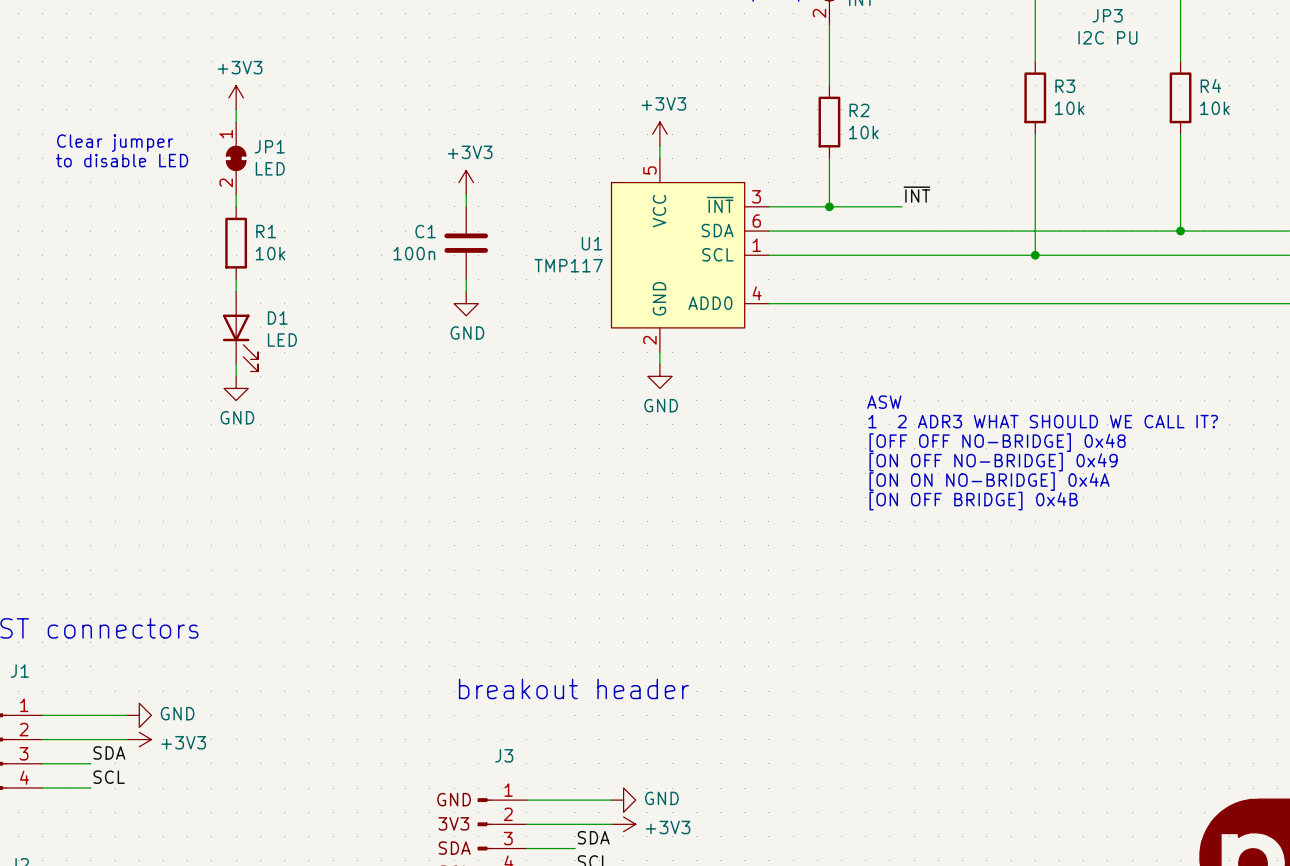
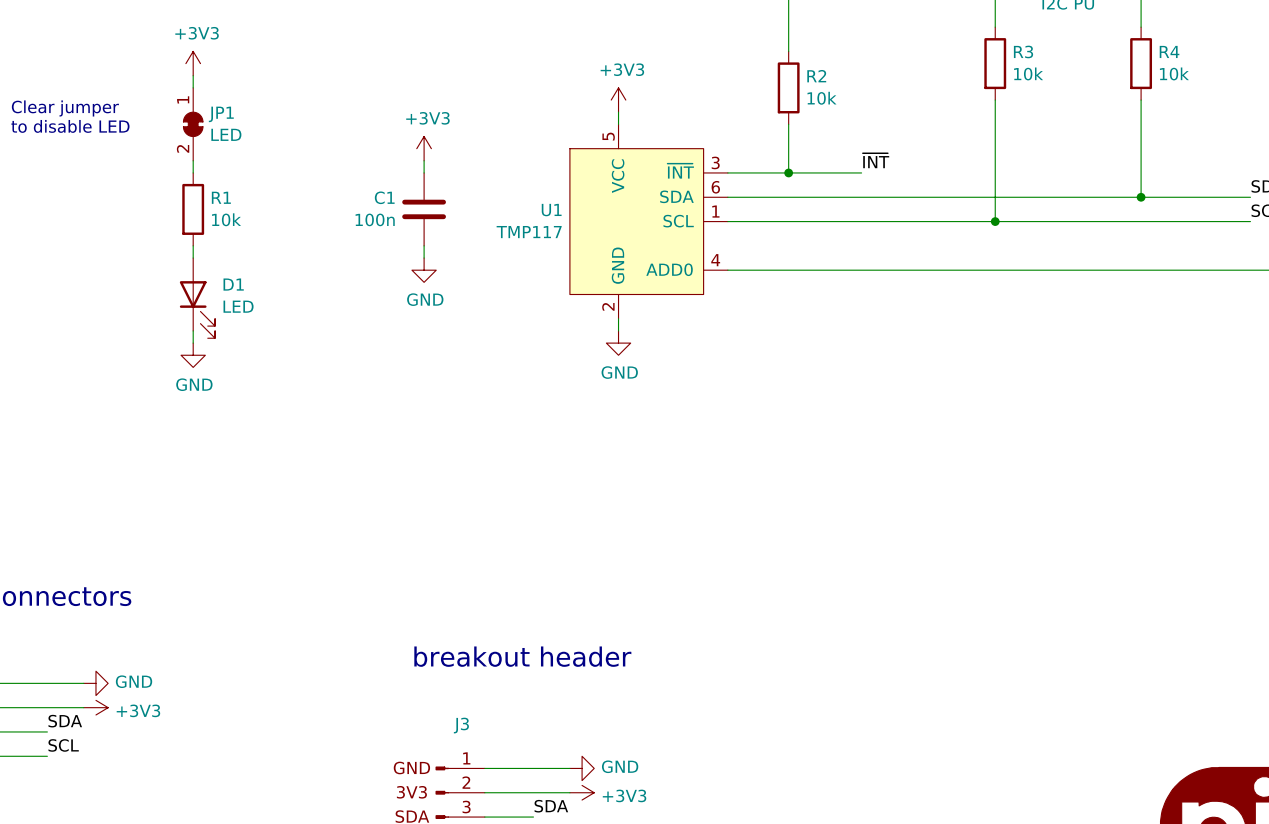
text: ASW (884, 402) -> none
text: 1 2 ADR3 WHAT SHOULD WE CALL IT? (1043, 421) -> none
text: [OFF OFF NO-BRIDGE] 0x48 (997, 442) -> none
text: [ON OFF NO-BRIDGE] 0x49 (993, 462) -> none
text: [ON ON NO-BRIDGE] 0x4A (989, 481) -> none
text: [ON OFF BRIDGE] 0x4B (973, 501) -> none

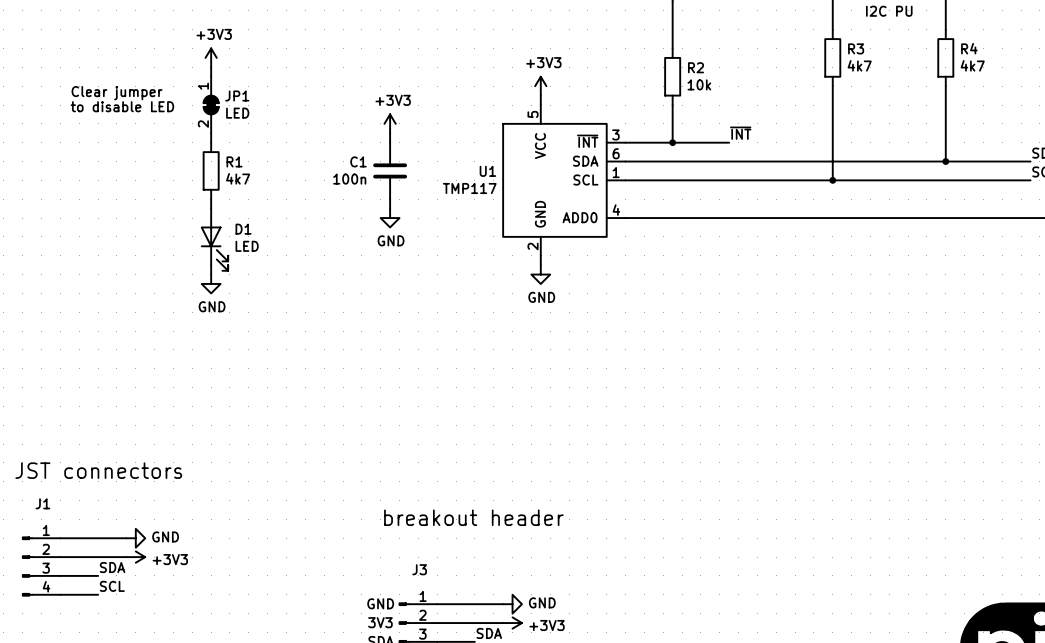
R3 value: 10k (1028, 73) -> 4k7 (859, 65)
R4 value: 10k (1174, 73) -> 4k7 (972, 65)
R1 value: 10k (226, 219) -> 4k7 (238, 178)

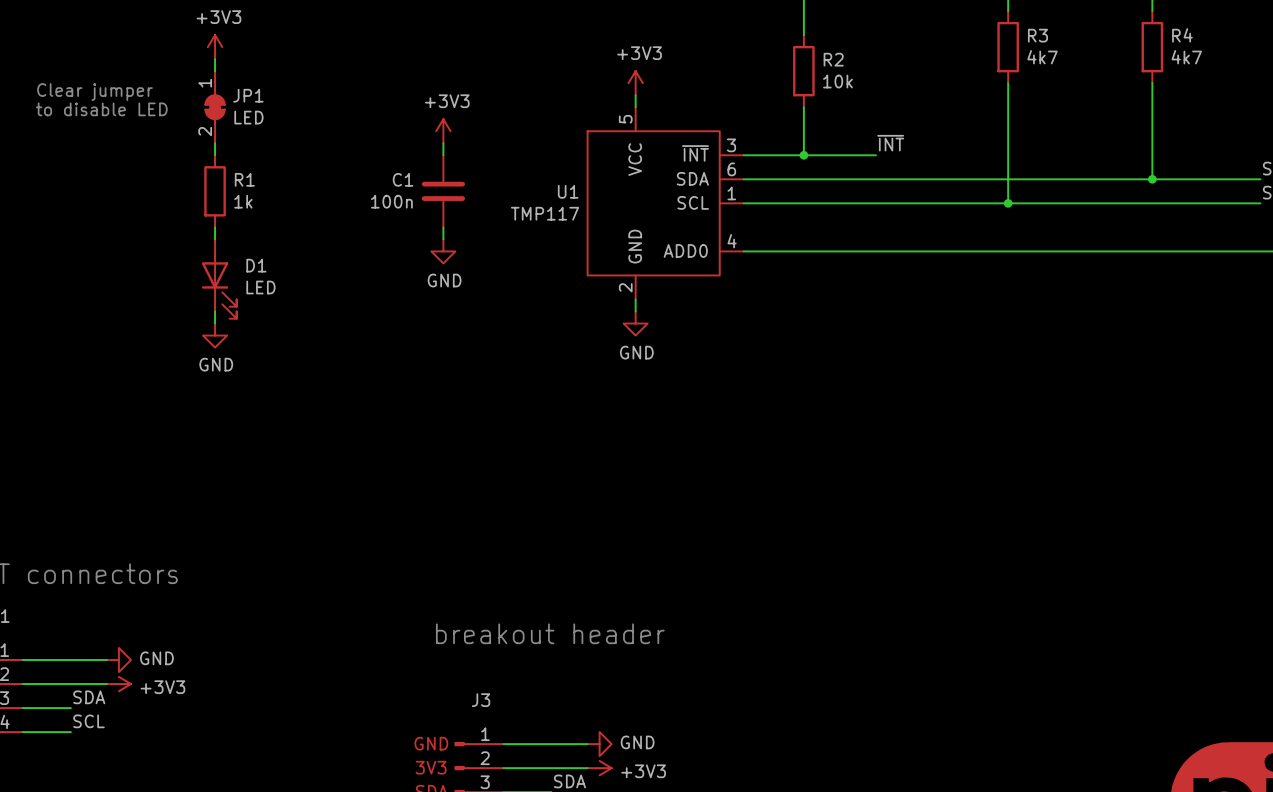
R1 value: 4k7 (238, 178) -> 1k (243, 201)

